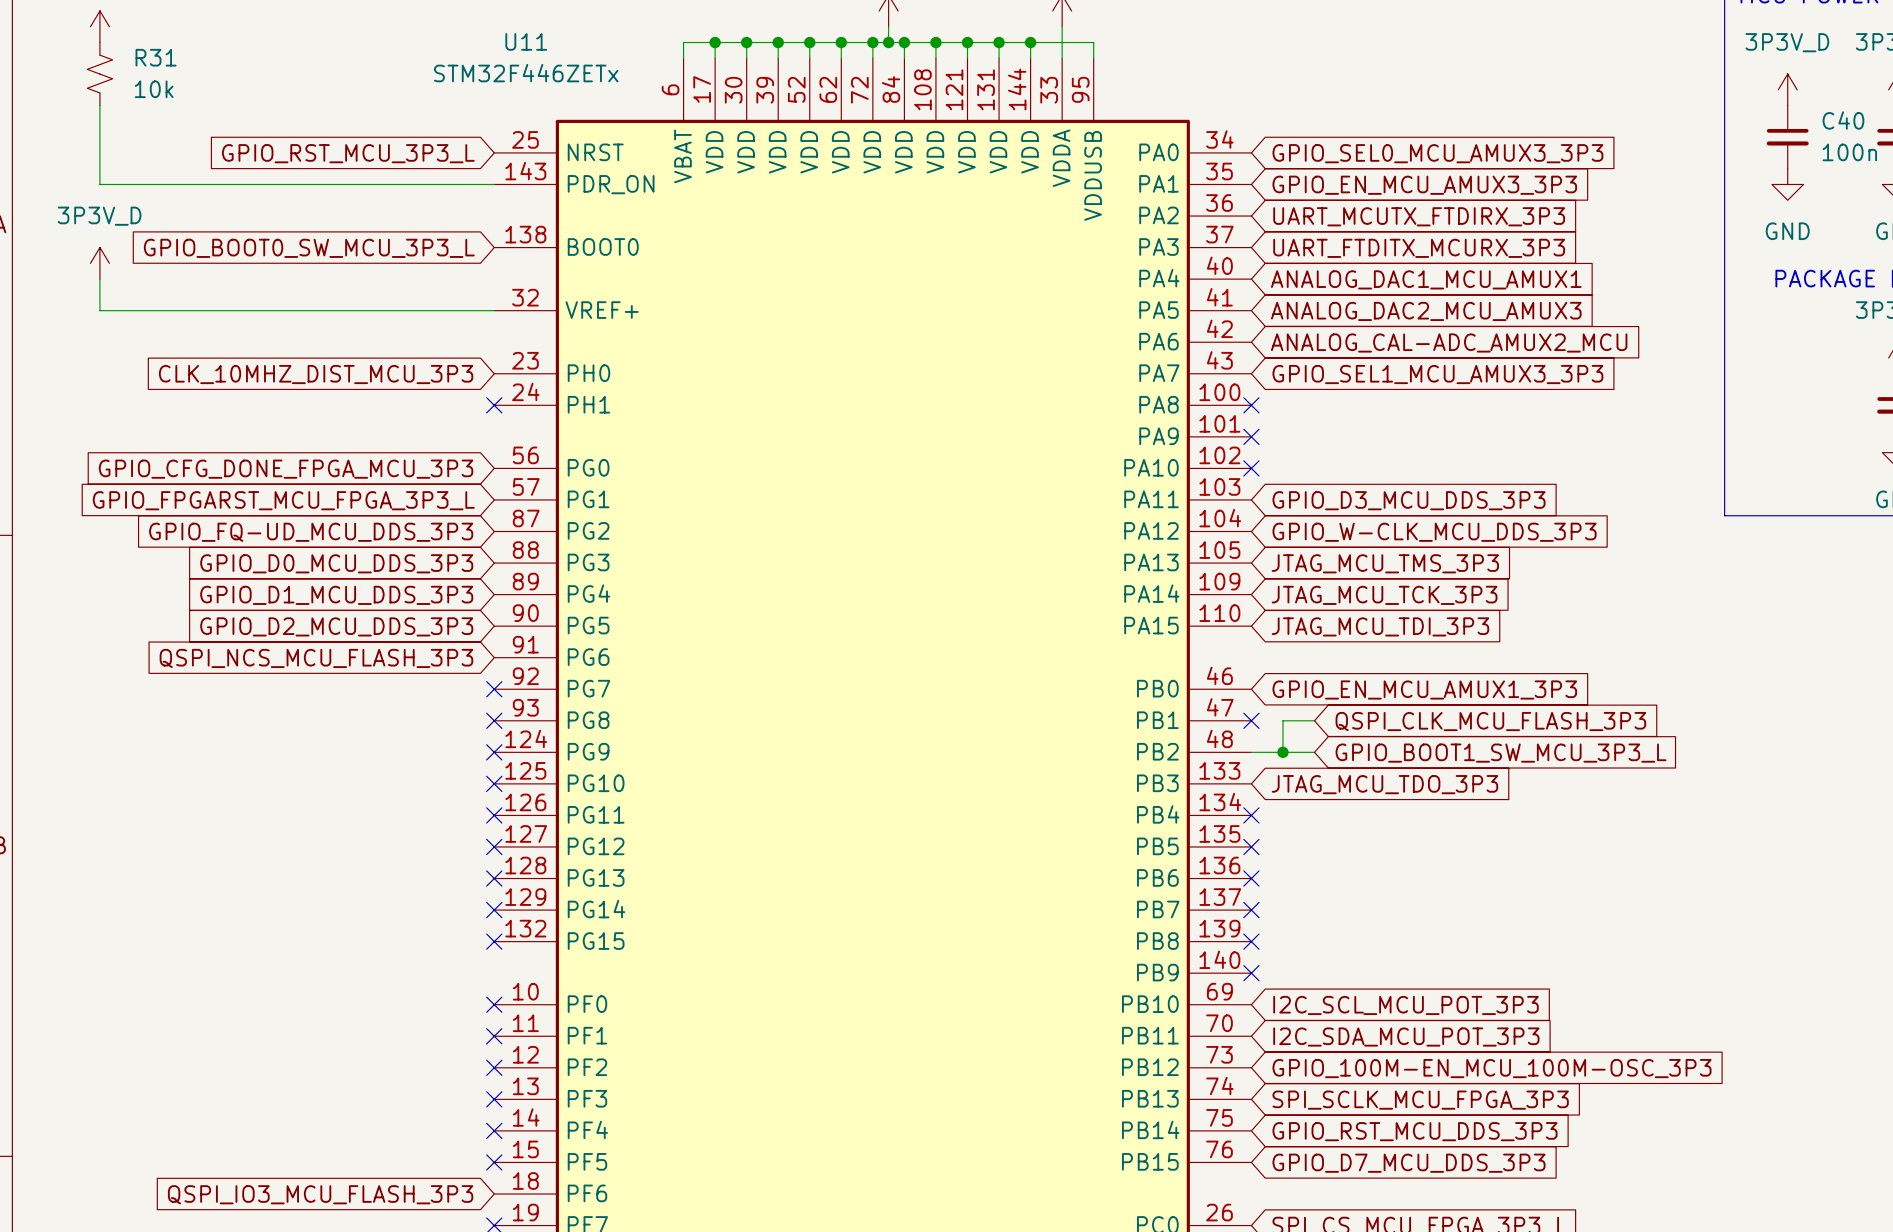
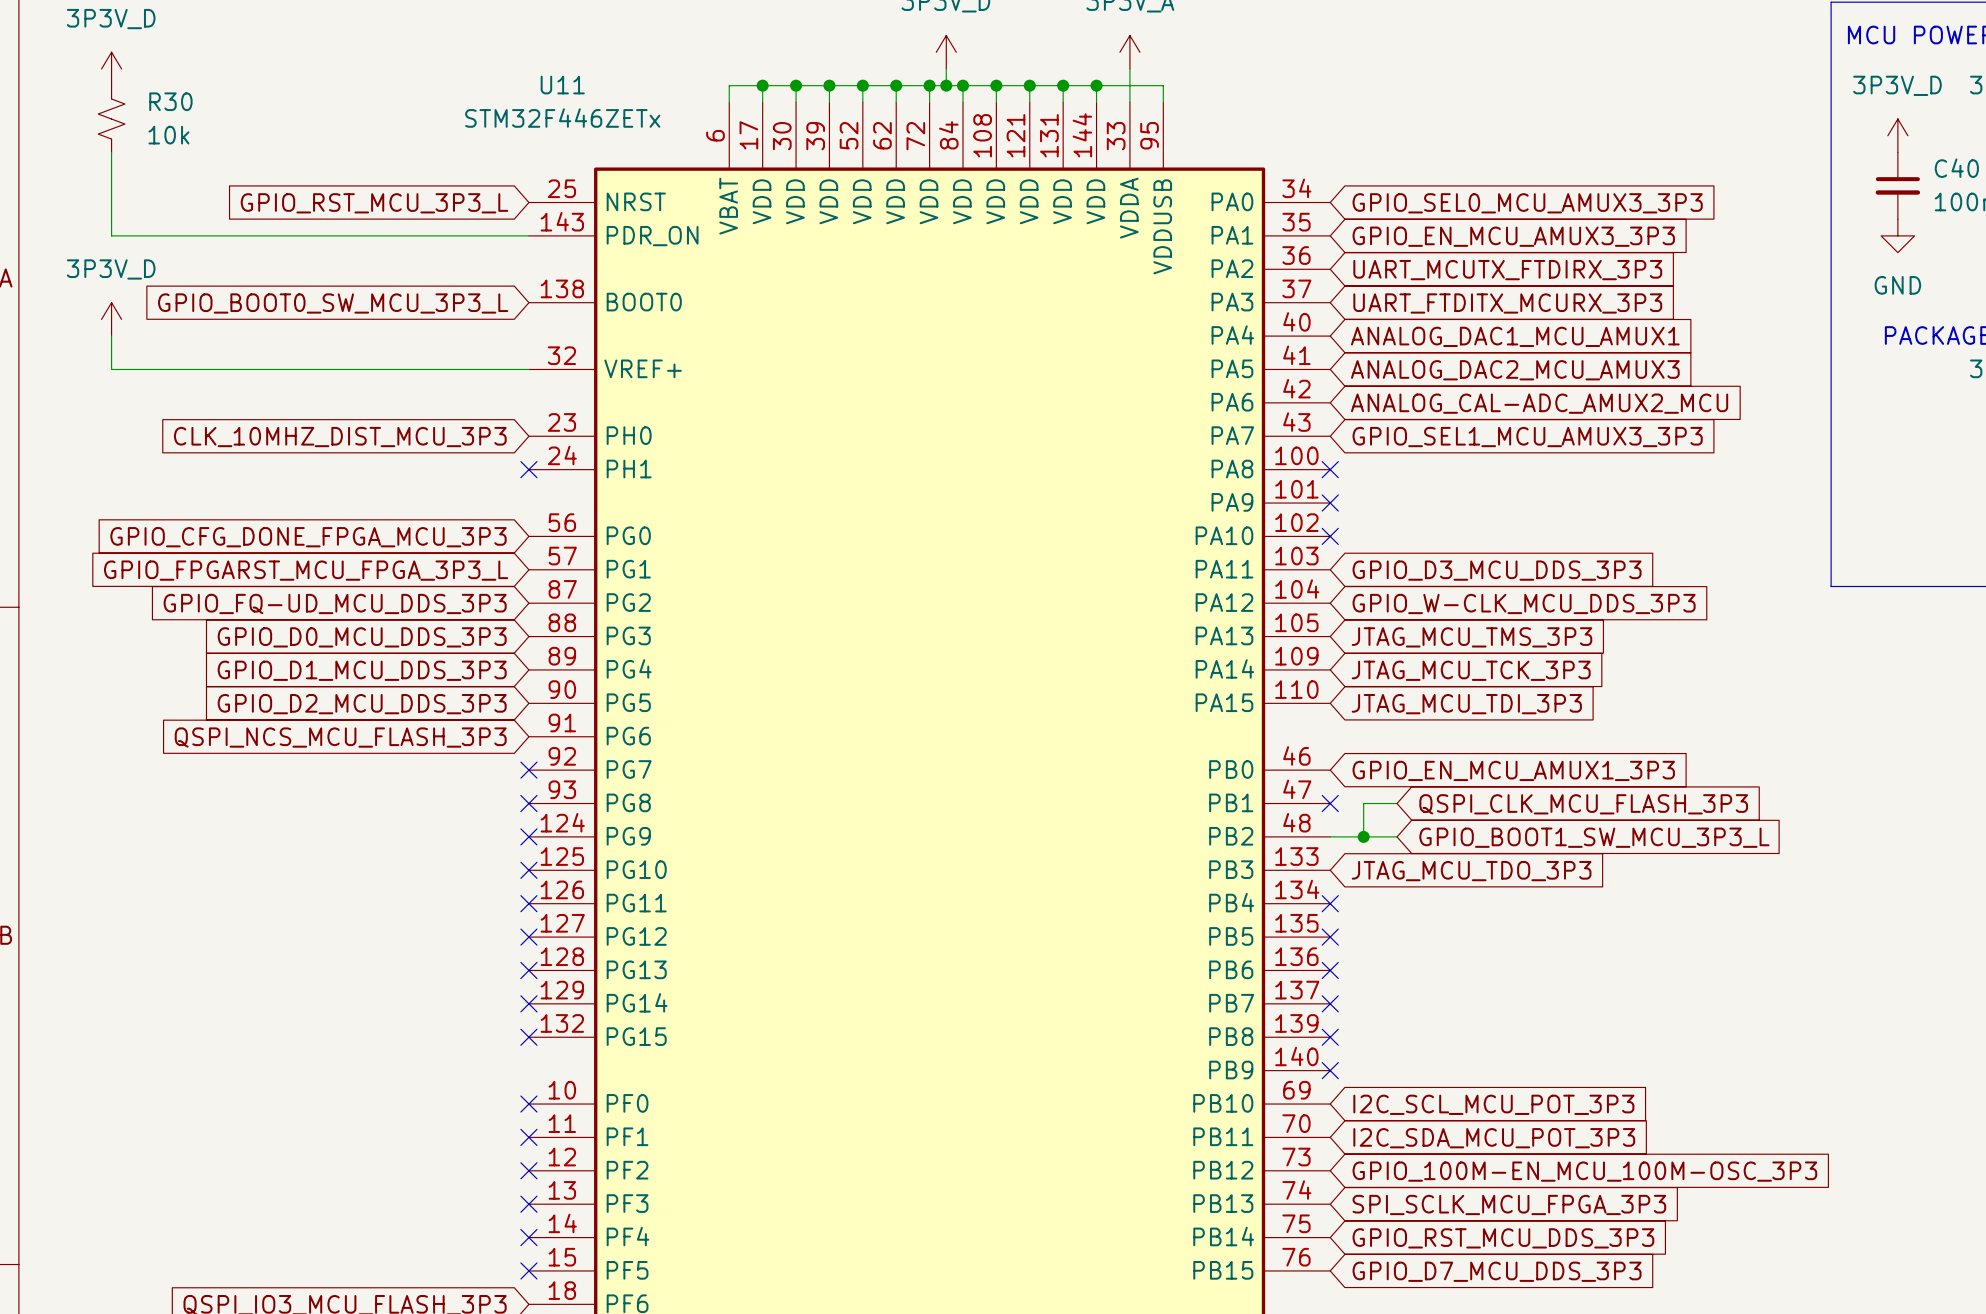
R31 name: R31 (156, 57) -> R30 (170, 101)

